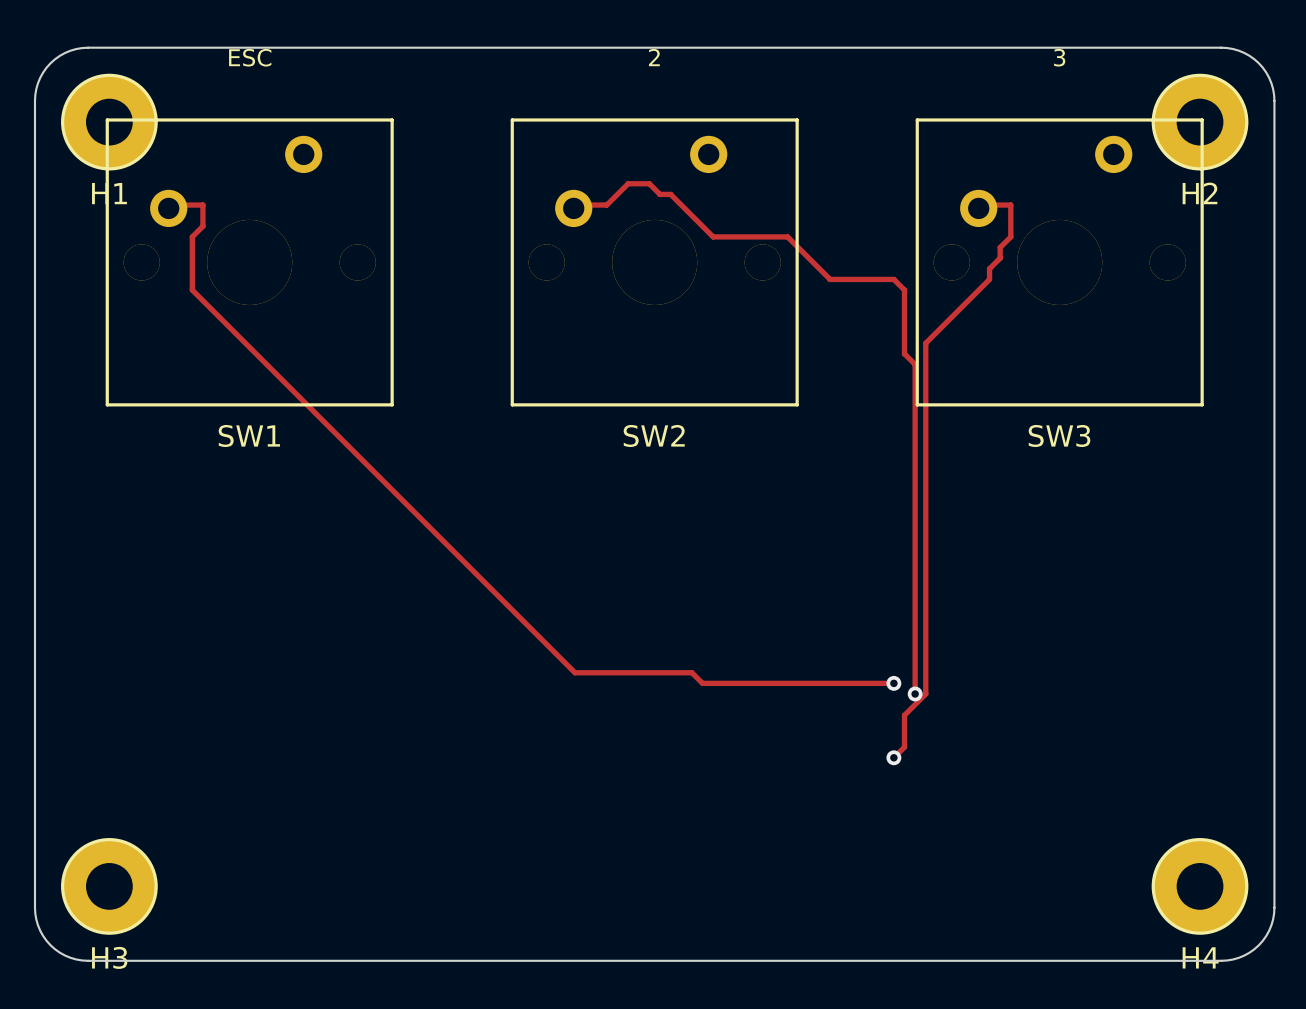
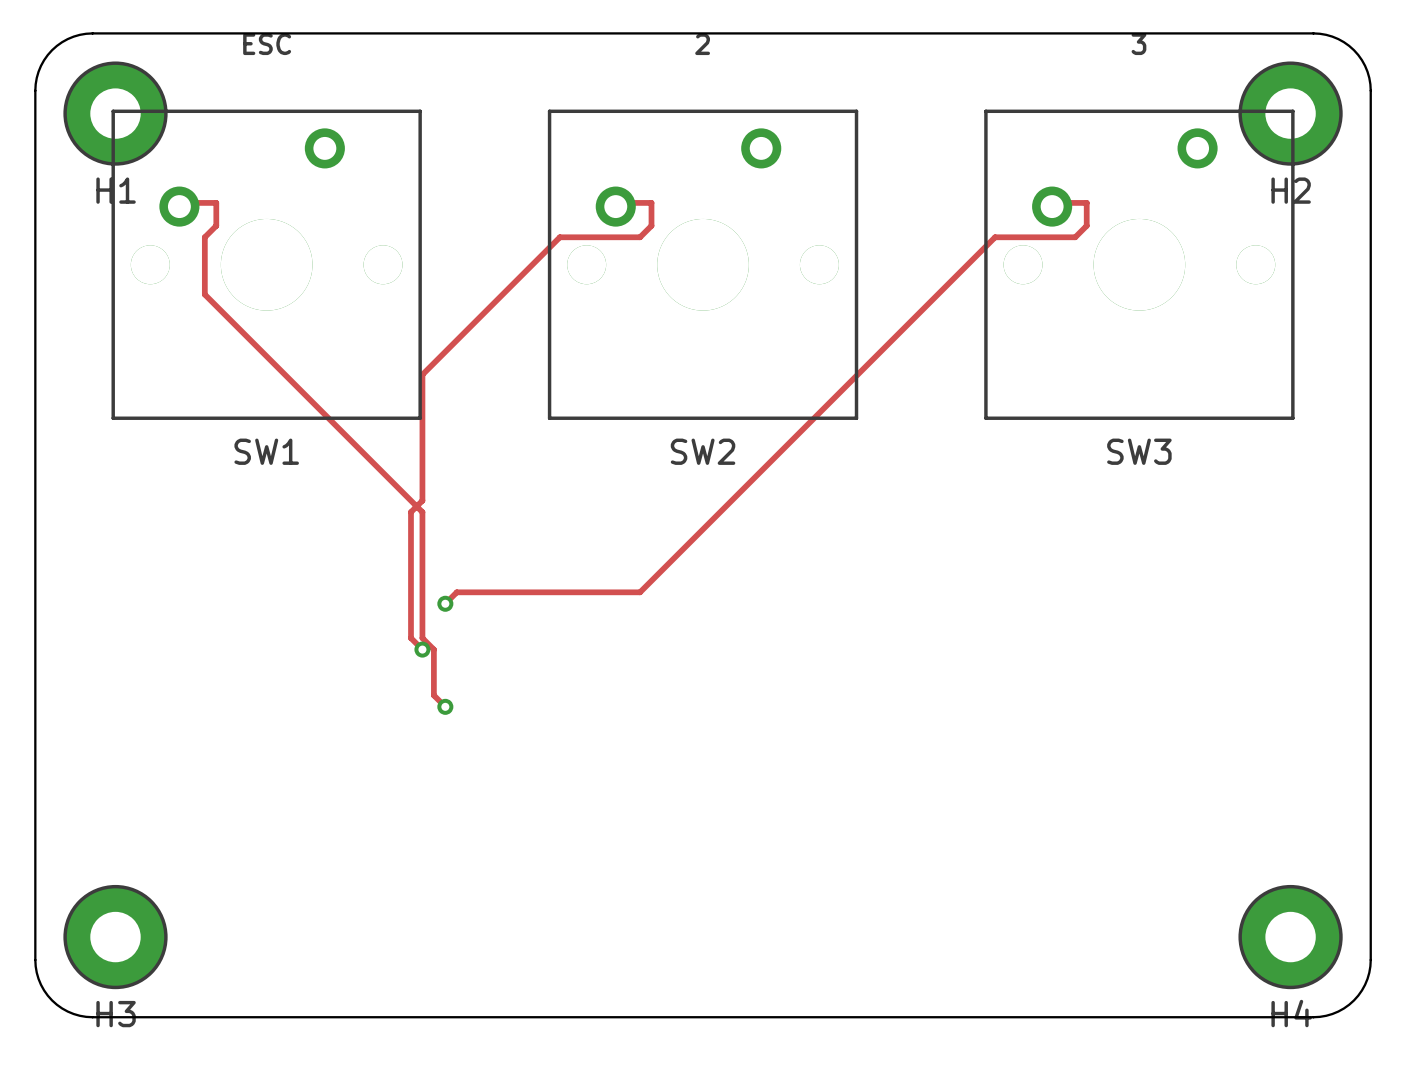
track: (606, 205) (628, 183) (649, 183) (660, 194) (670, 194) (713, 236) (787, 236) (830, 279) (893, 279) (904, 290) (904, 353) (915, 364) (915, 694) -> (651, 202) (651, 225) (640, 237) (559, 237) (422, 374) (422, 500) (410, 512) (410, 638) (422, 649)
track: (1010, 226) (1010, 236) (1000, 247) (1000, 258) (989, 268) (989, 279) (925, 343) (925, 694) (904, 715) (904, 747) (893, 757) -> (1086, 225) (1075, 237) (995, 237) (640, 592) (456, 592) (445, 603)
track: (394, 492) (574, 672) (691, 672) (702, 683) (893, 683) -> (422, 512) (422, 638) (433, 649) (433, 695) (445, 706)
via: none -> (445, 603)
via: none -> (422, 649)
via: none -> (445, 706)
via: (893, 683) -> none
via: (915, 694) -> none
via: (893, 757) -> none

